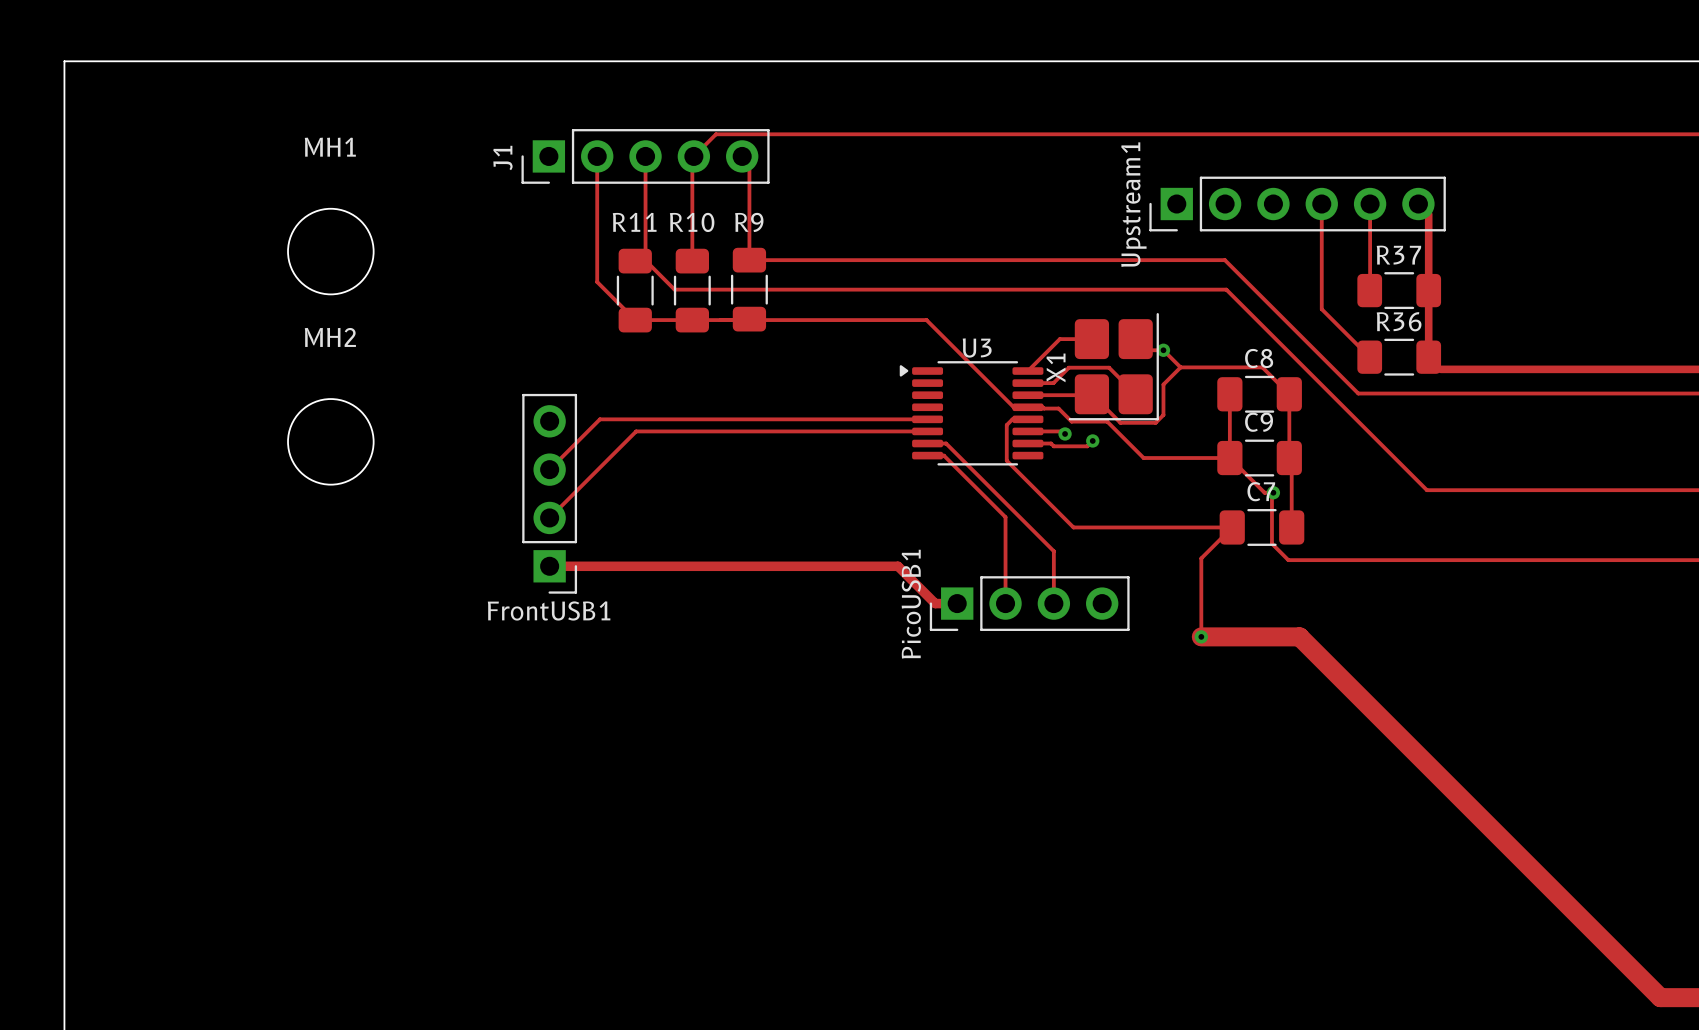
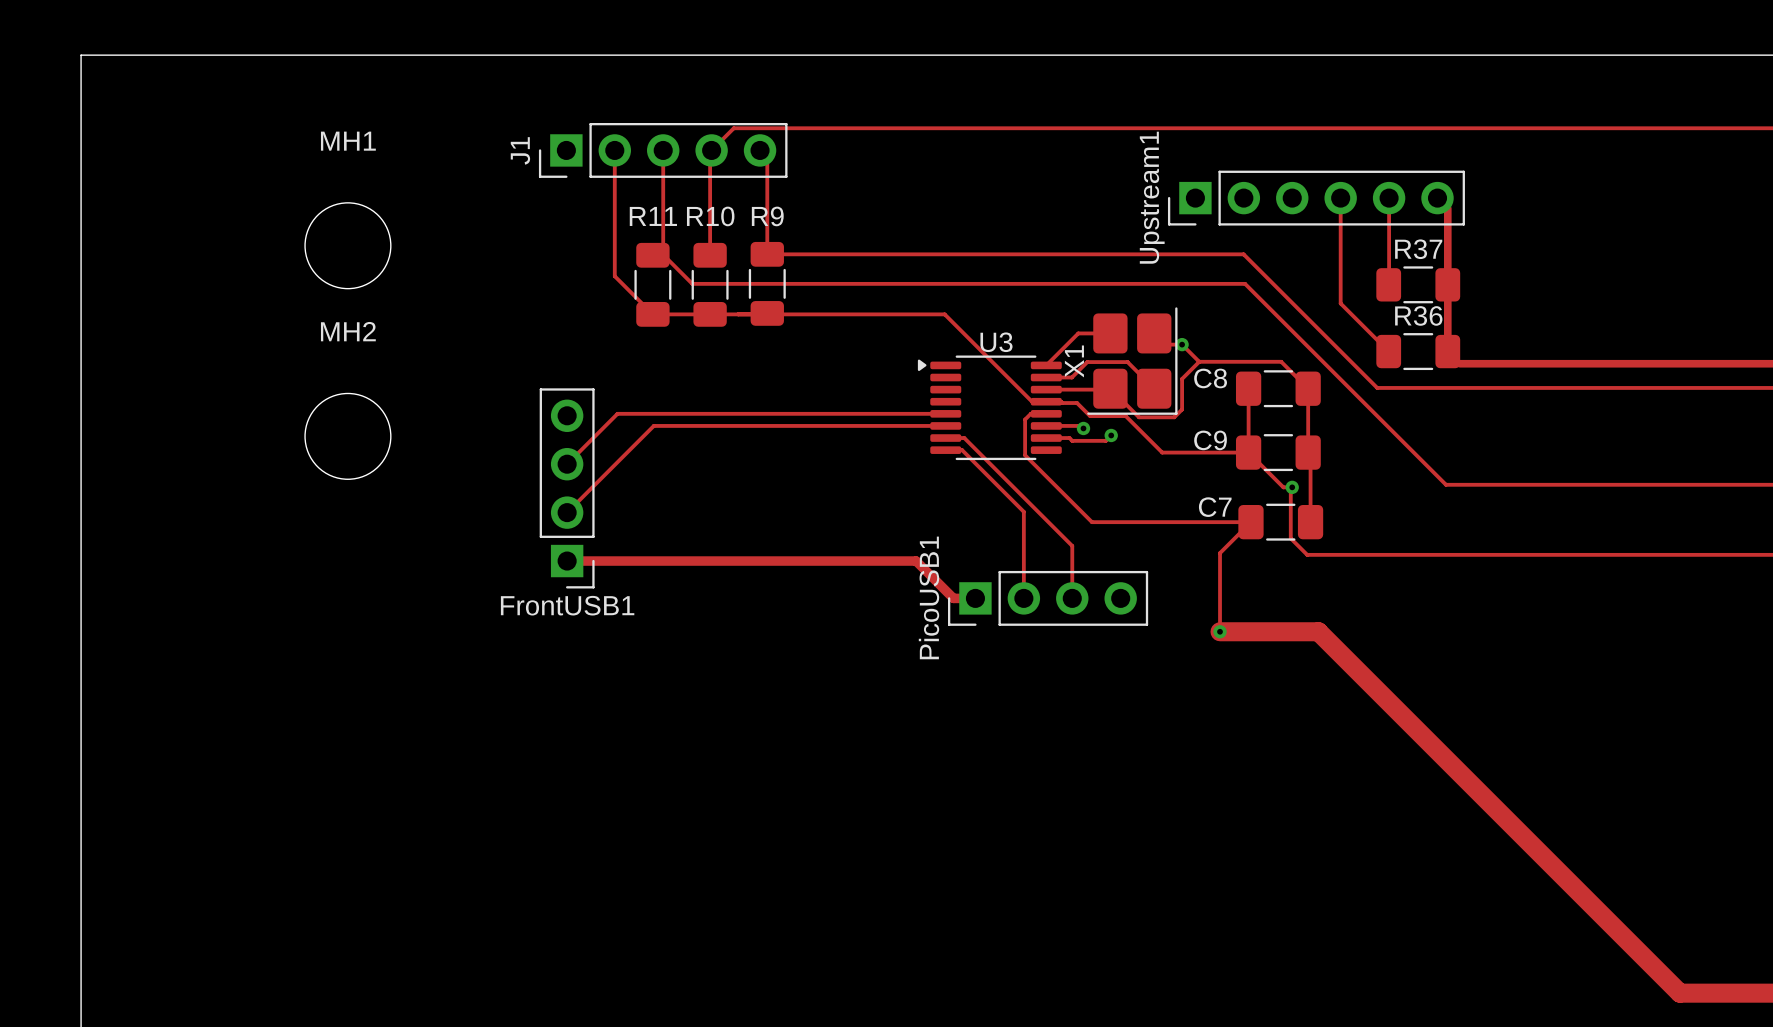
C8 name position: C8 (1259, 358) -> C8 (1210, 378)
C9 name position: C9 (1259, 422) -> C9 (1210, 440)
C7 name position: C7 (1261, 491) -> C7 (1215, 507)

